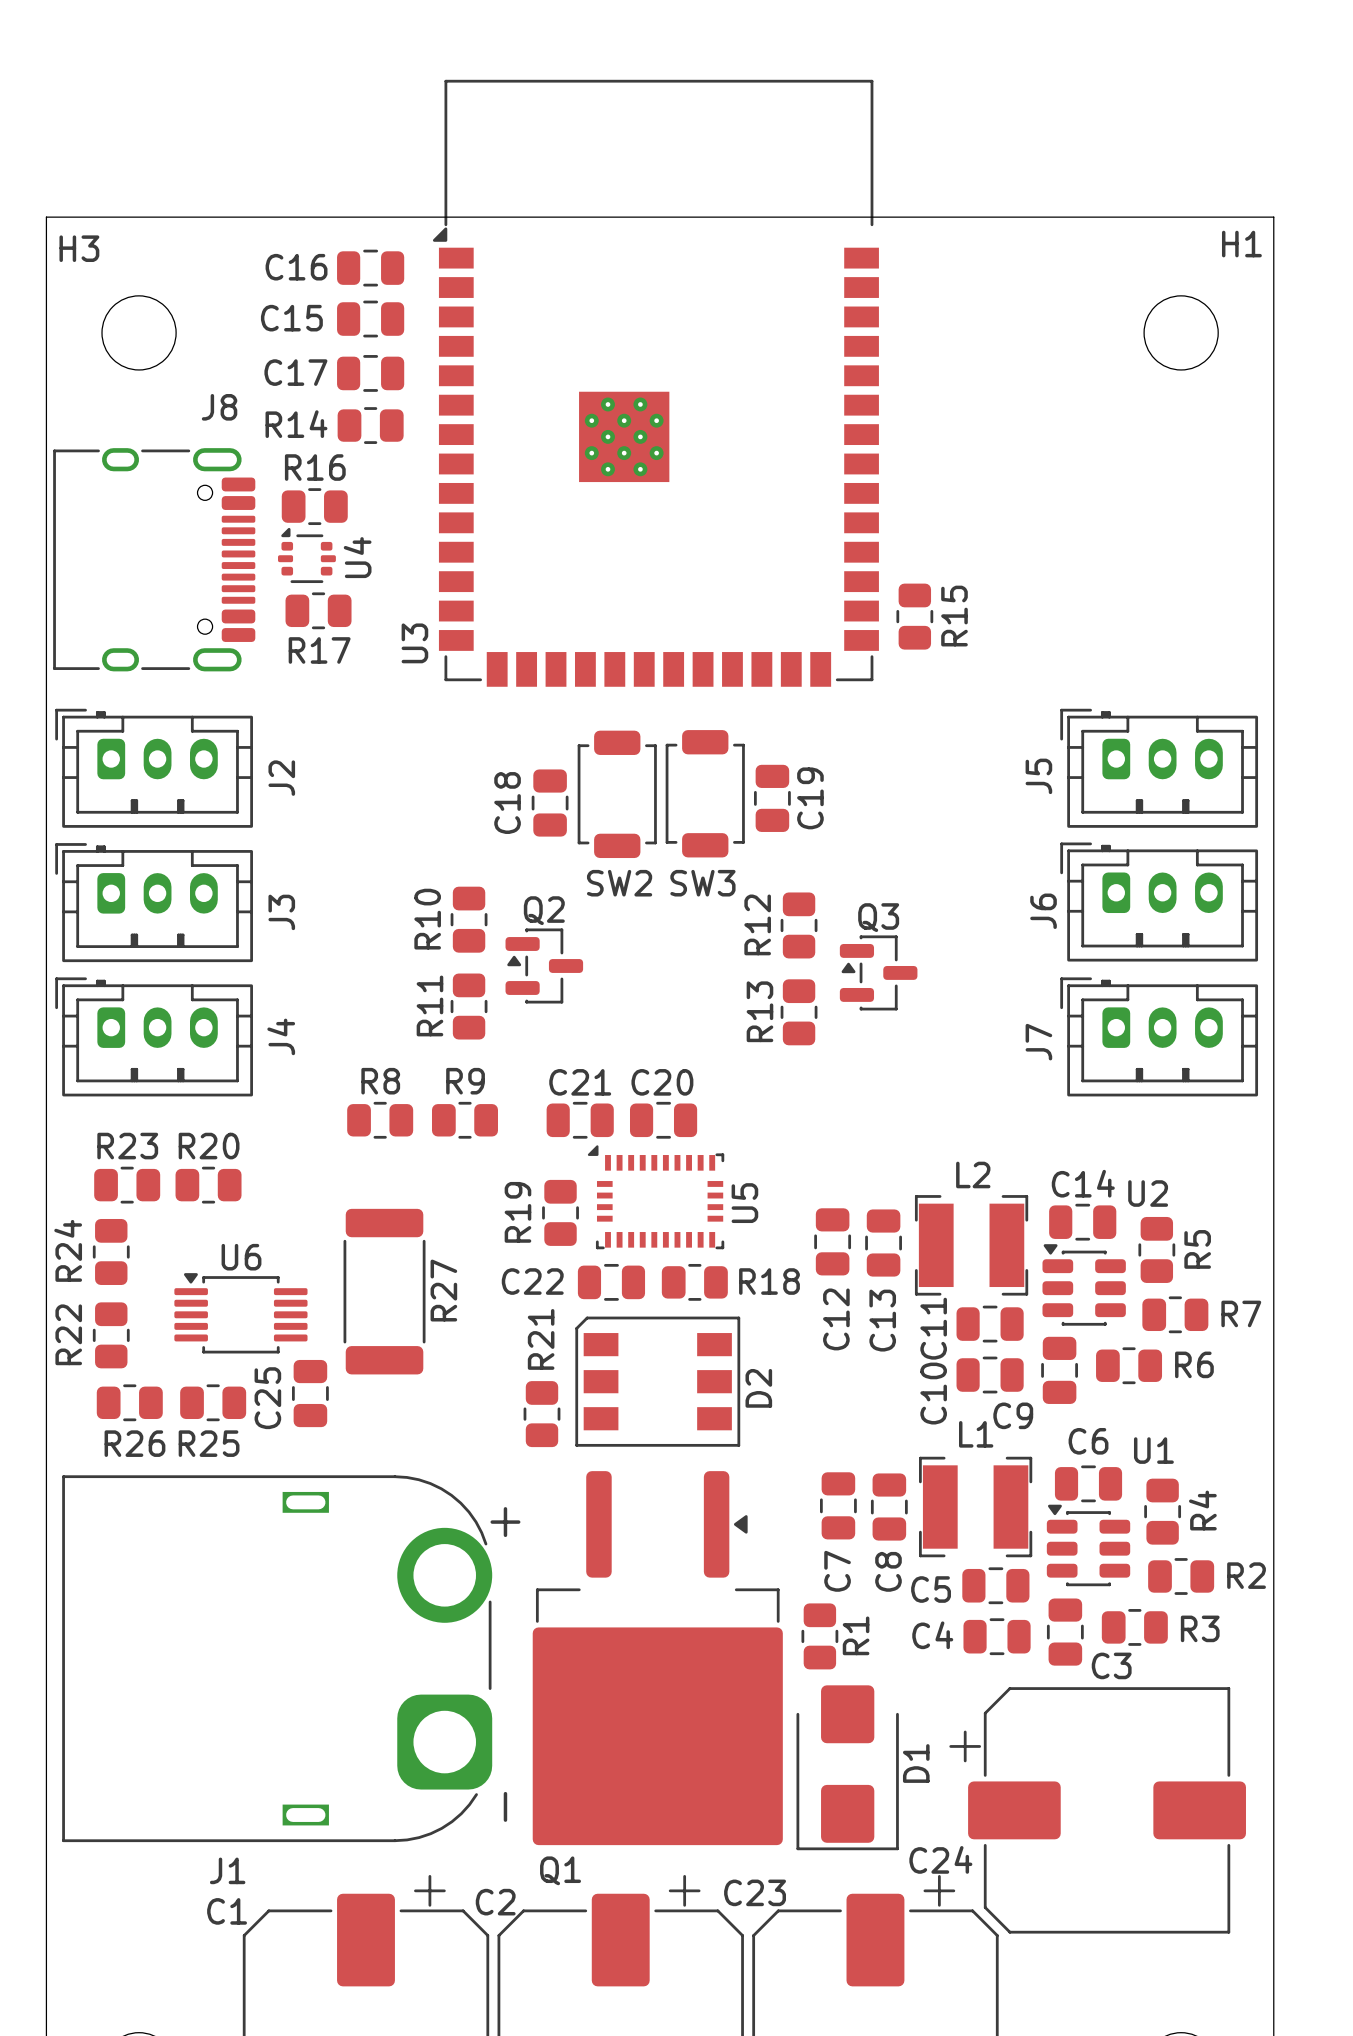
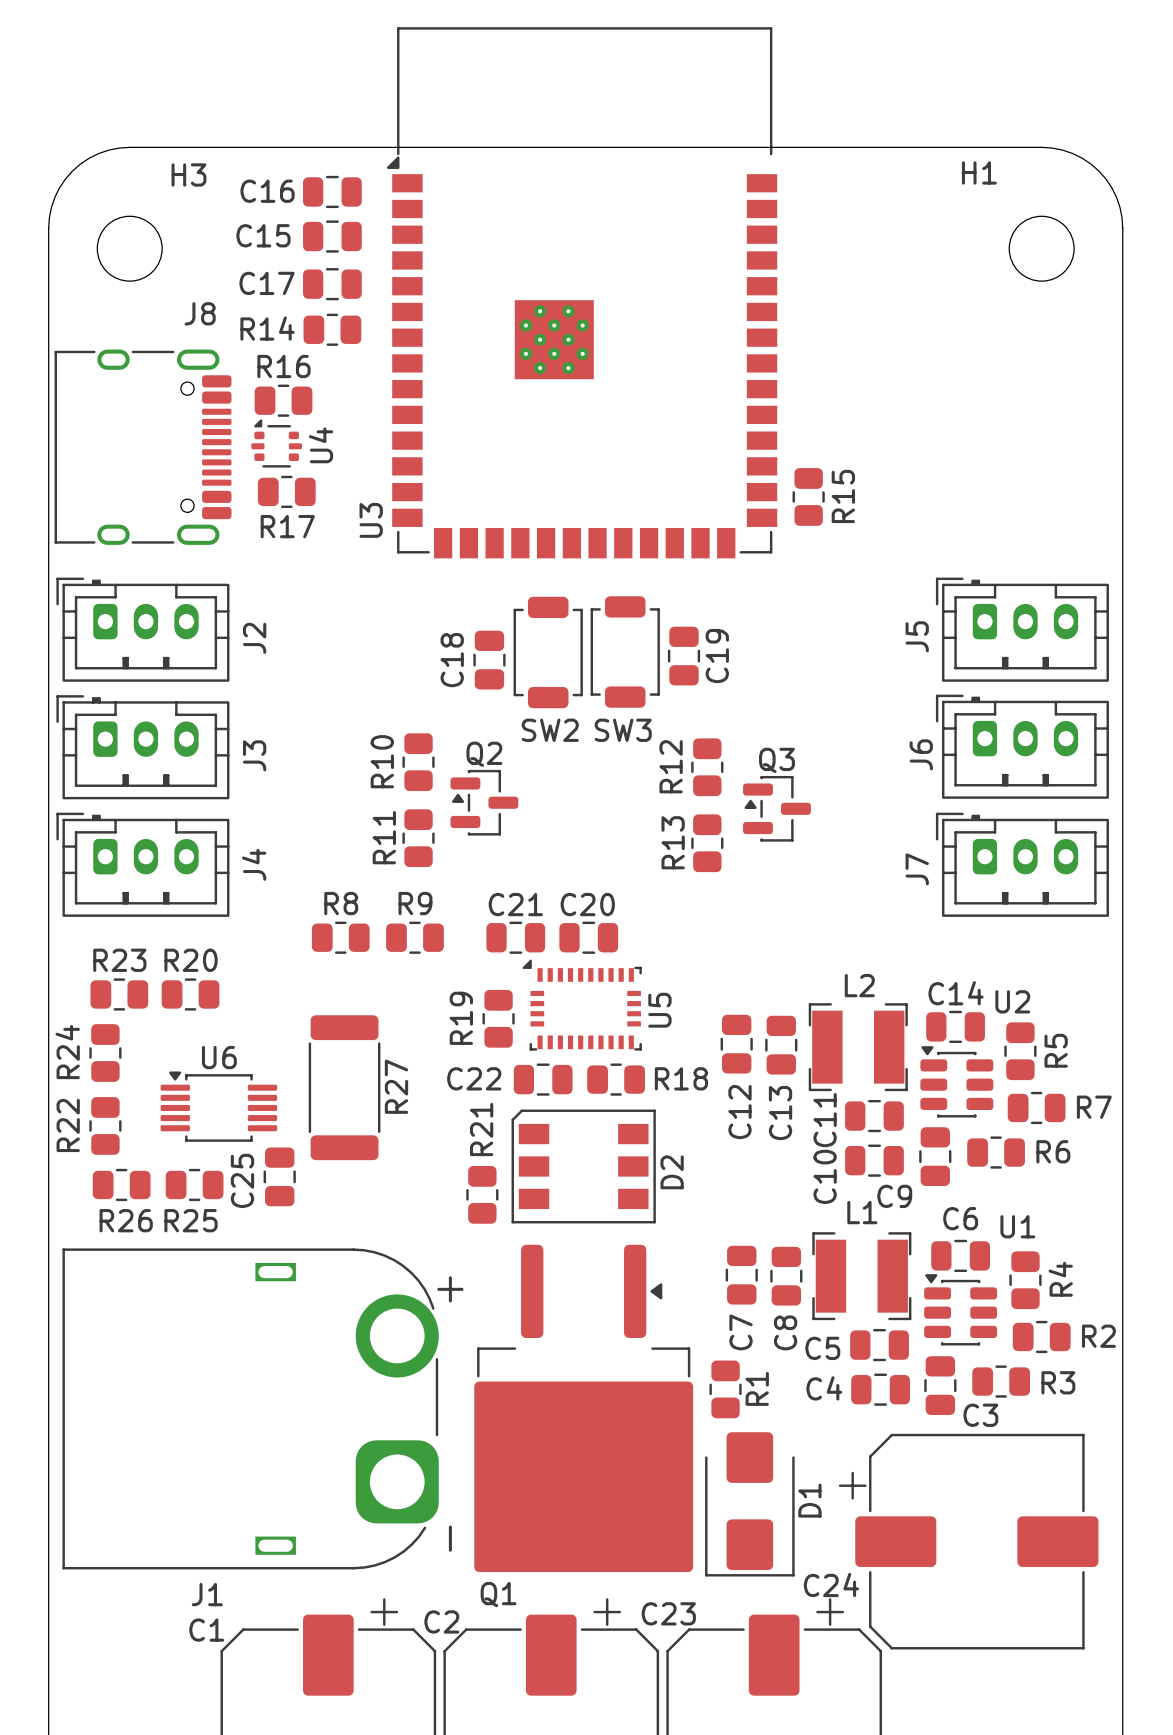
board edge: (139, 217) (46, 217) (46, 309) -> (129, 147) (98, 153) (72, 171) (54, 197) (48, 228)
board edge: (1181, 217) (1273, 217) (1273, 309) -> (1041, 147) (1072, 153) (1099, 171) (1116, 197) (1122, 228)
H1 name position: H1 (1241, 244) -> H1 (979, 172)
H3 name position: H3 (79, 248) -> H3 (188, 174)

